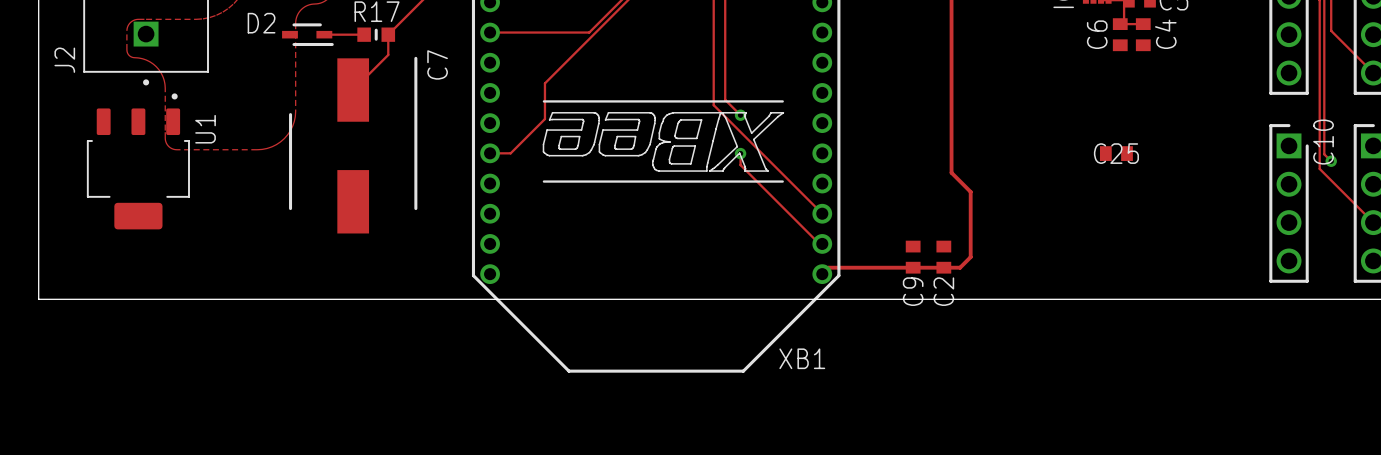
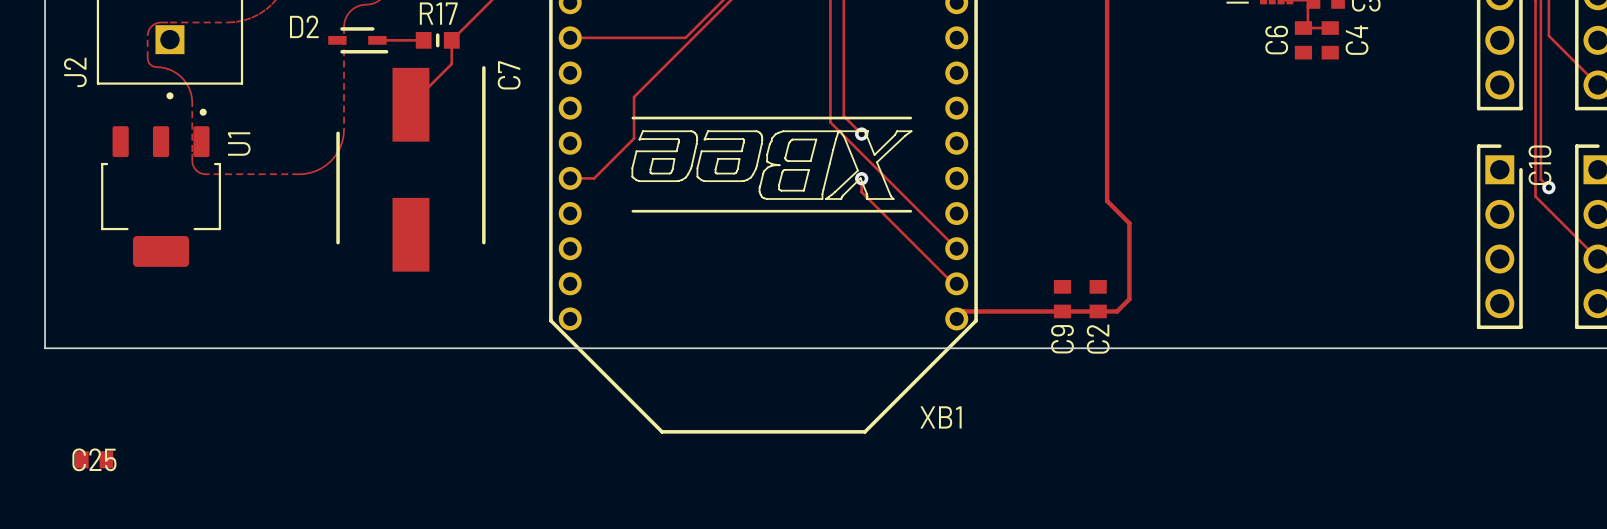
C25 position: (1116, 153) -> (94, 459)

